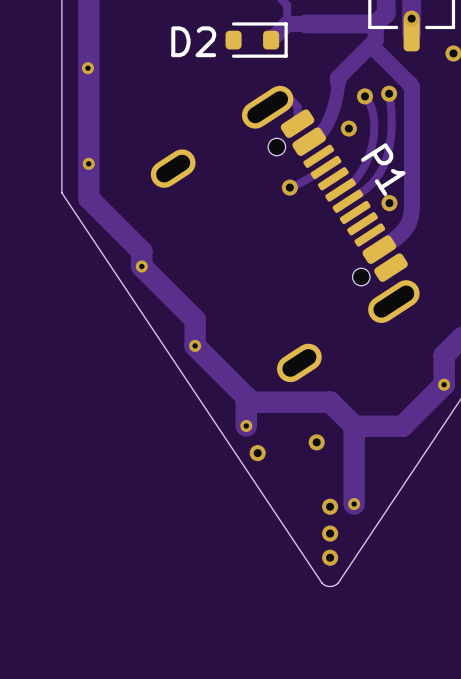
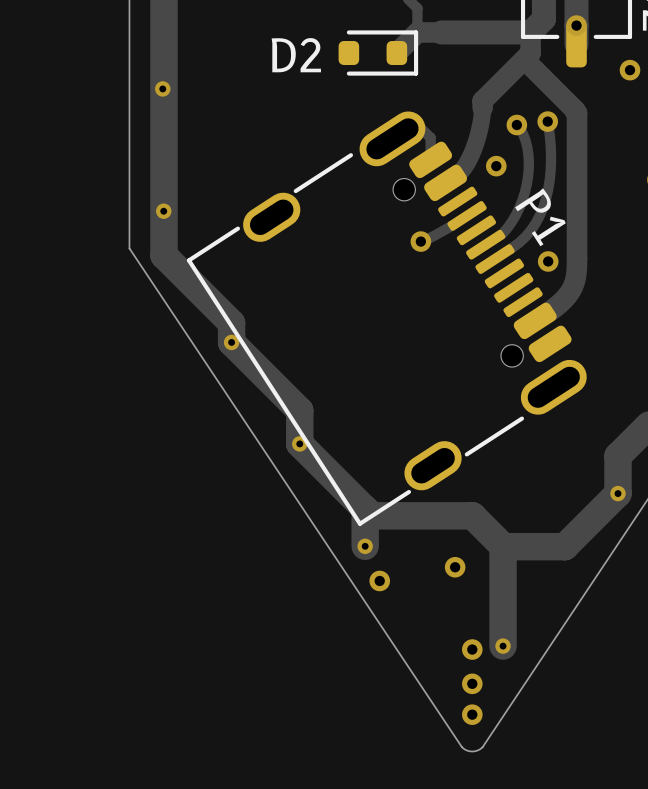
P1 footprint: [150, 85, 420, 383] -> [186, 111, 587, 526]

